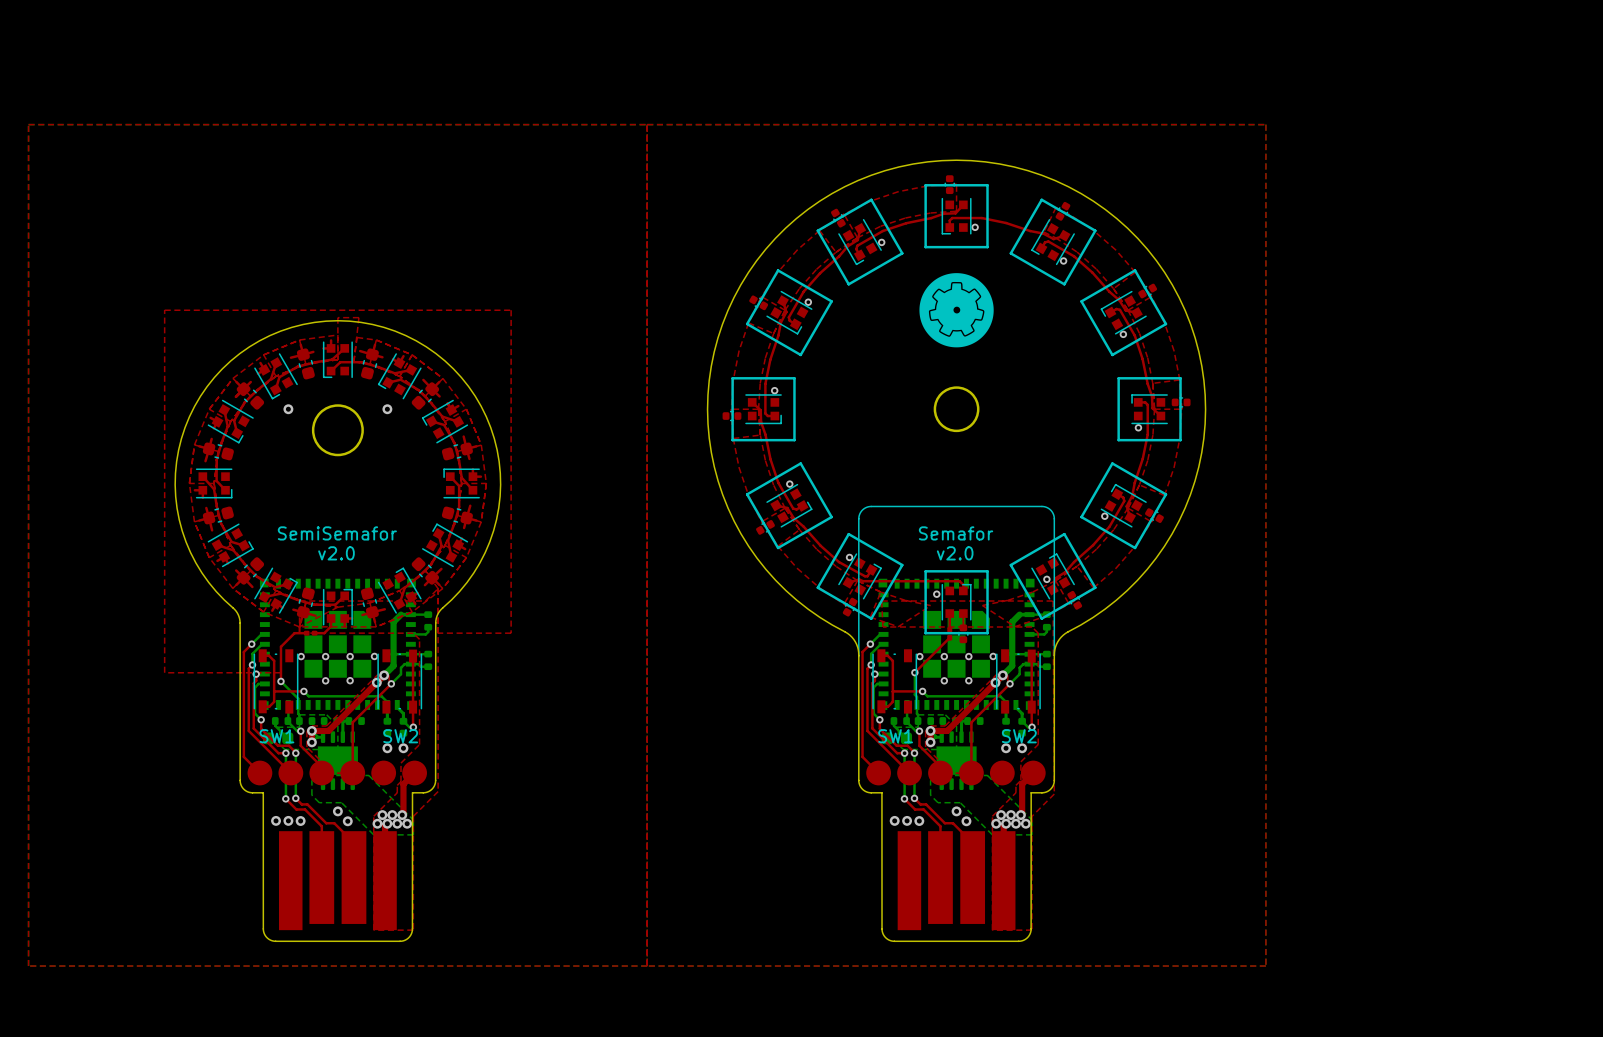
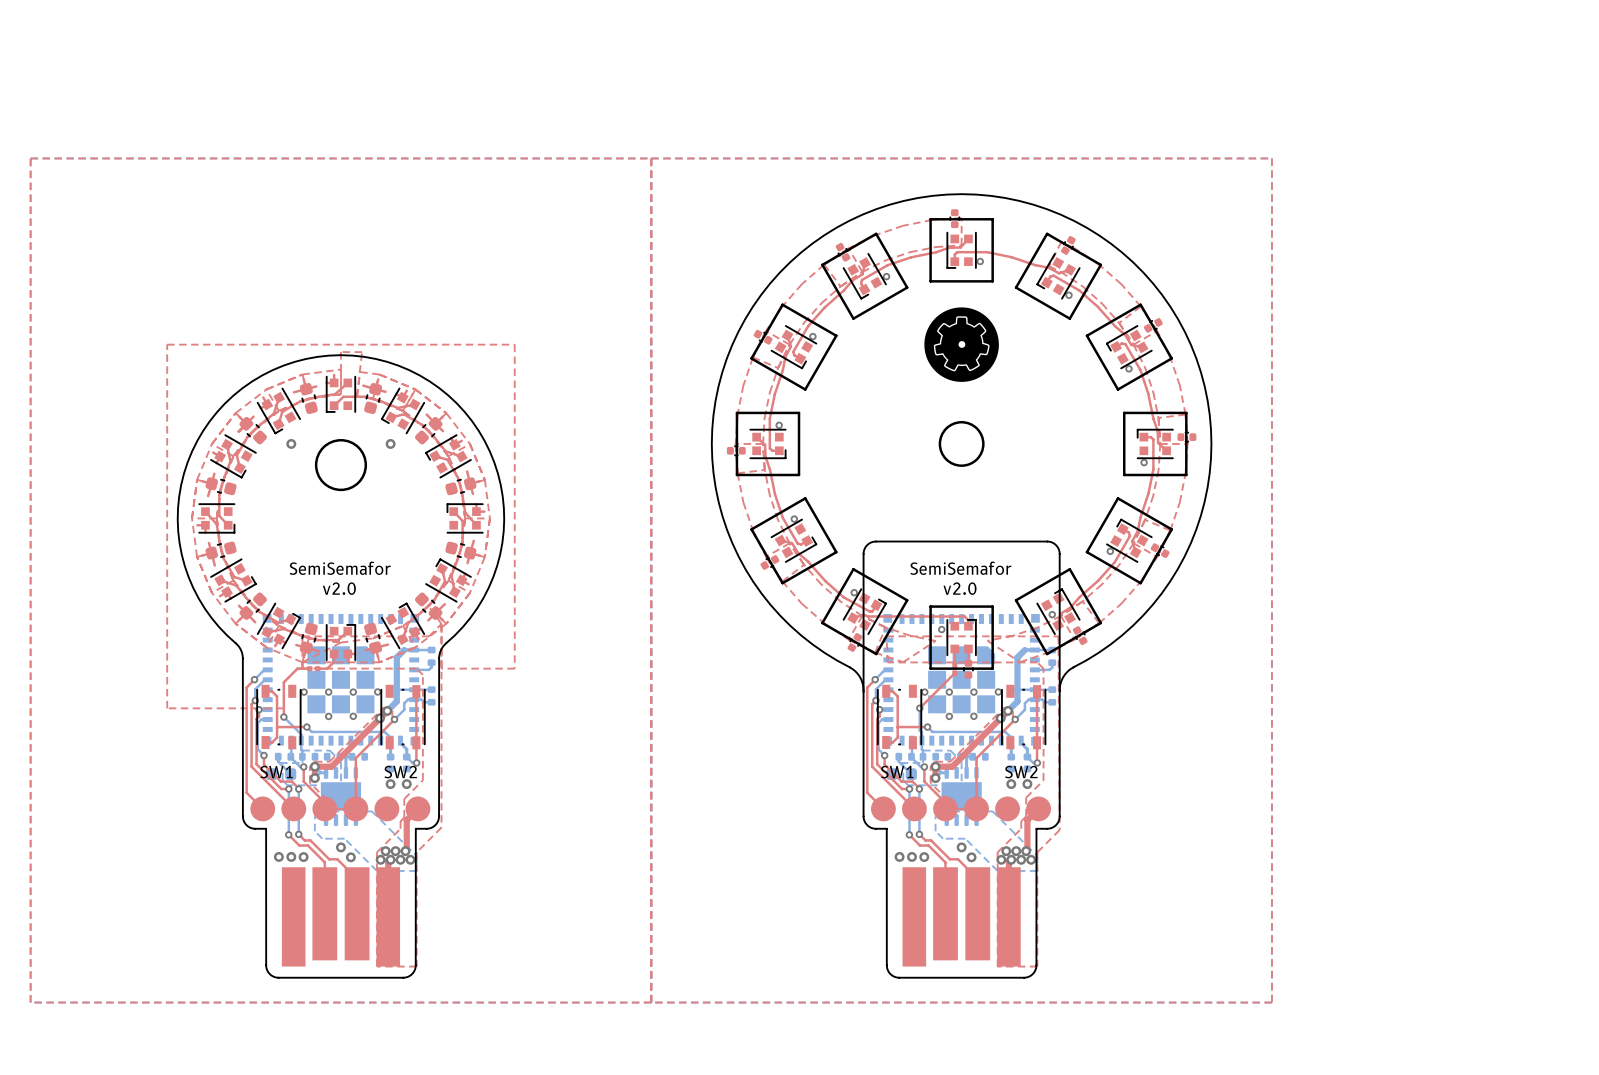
text: Semafor (956, 533) -> SemiSemafor (960, 568)

